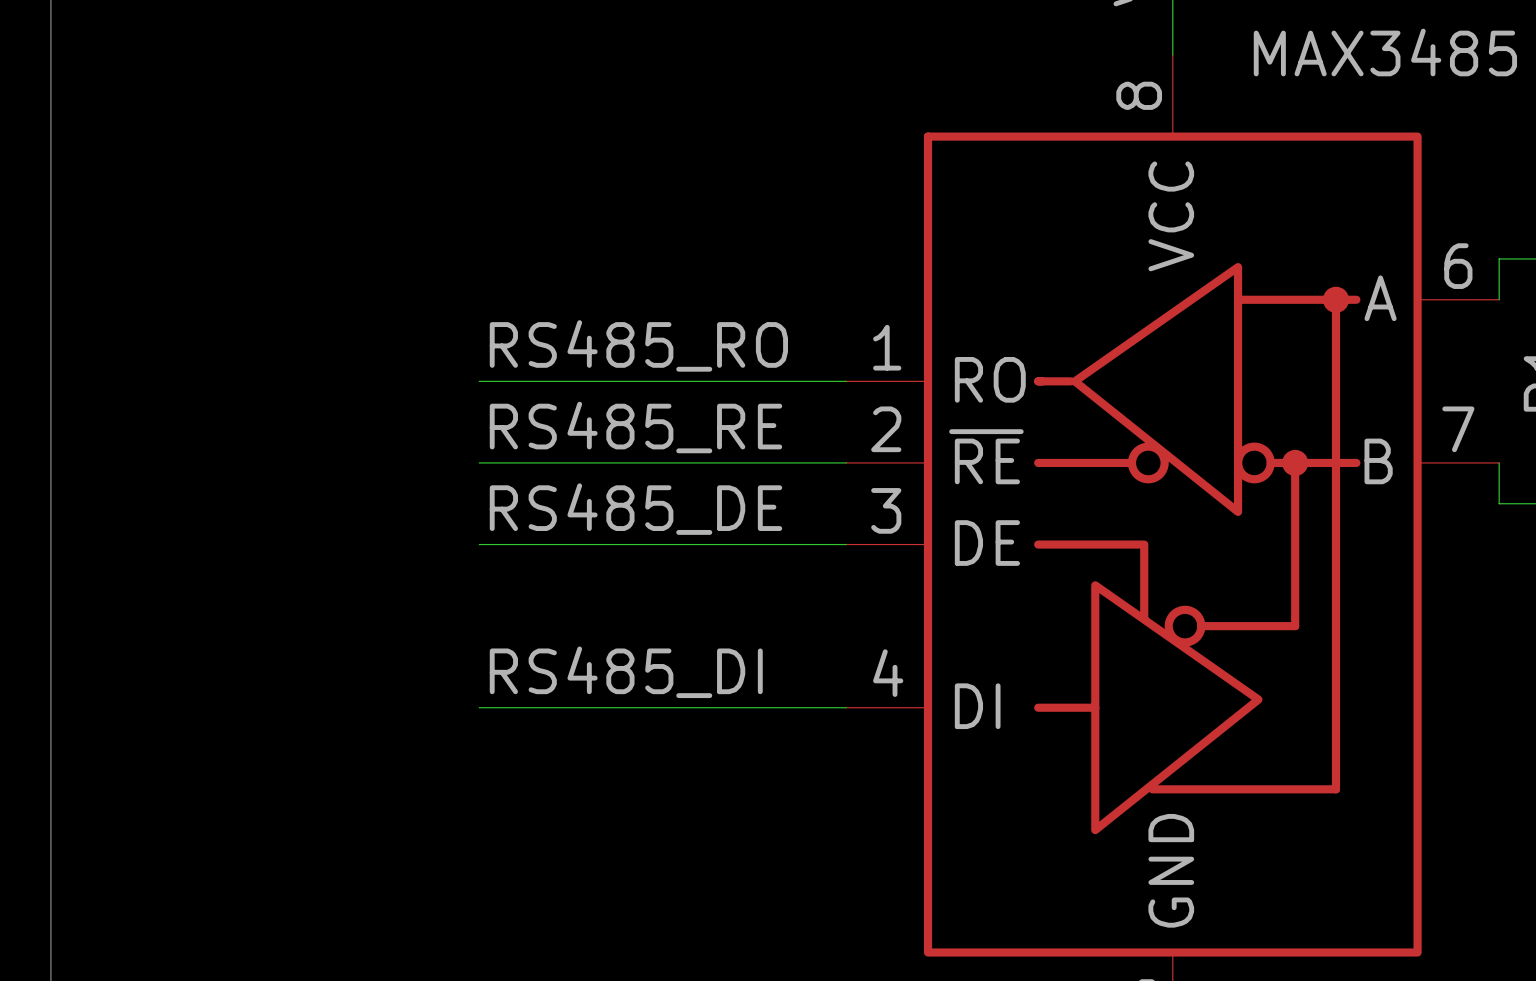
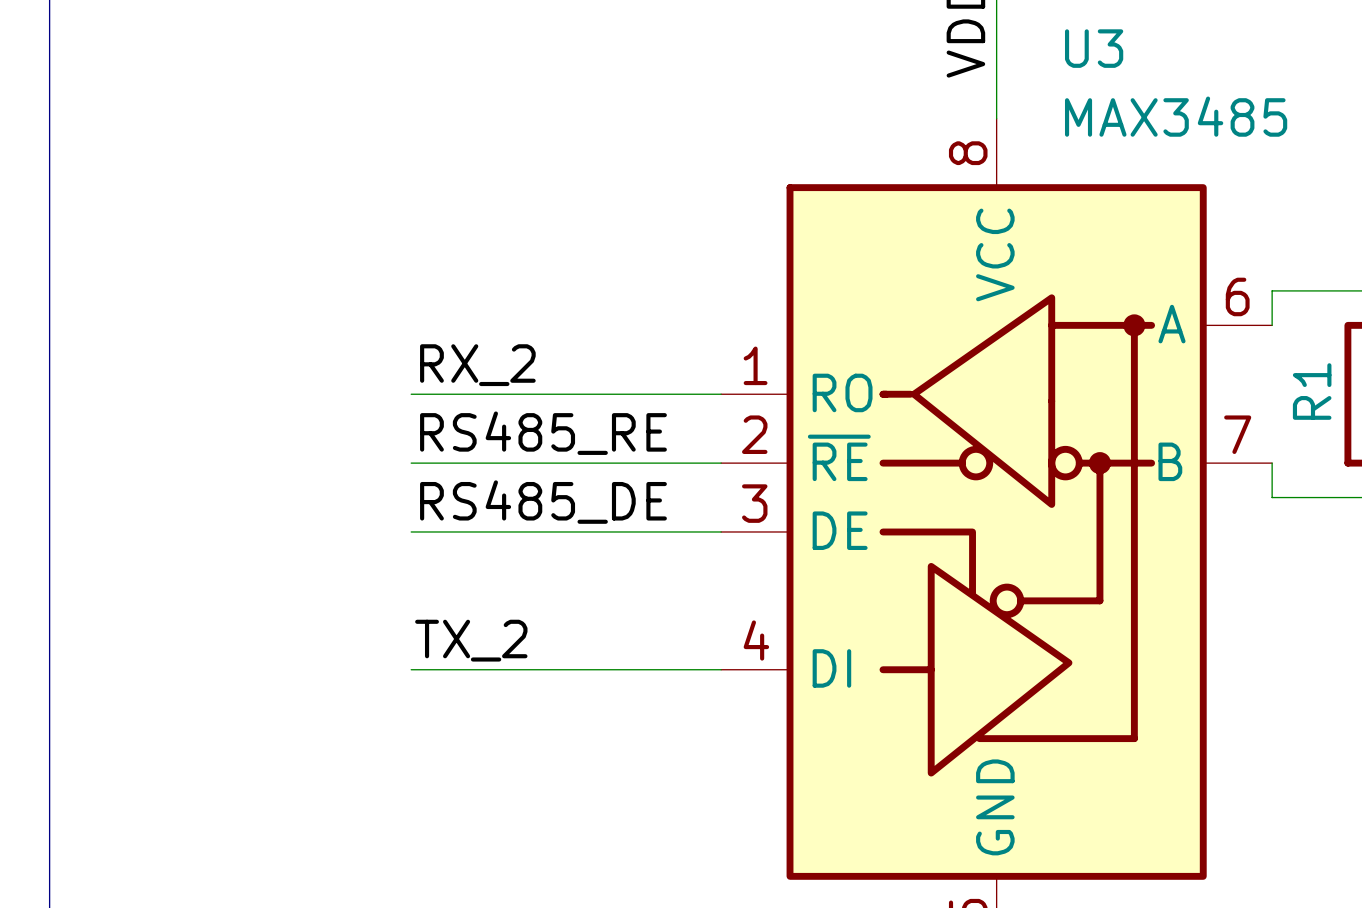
label: RS485_RO (638, 345) -> RX_2 (477, 365)
label: RS485_DI (626, 672) -> TX_2 (471, 640)

